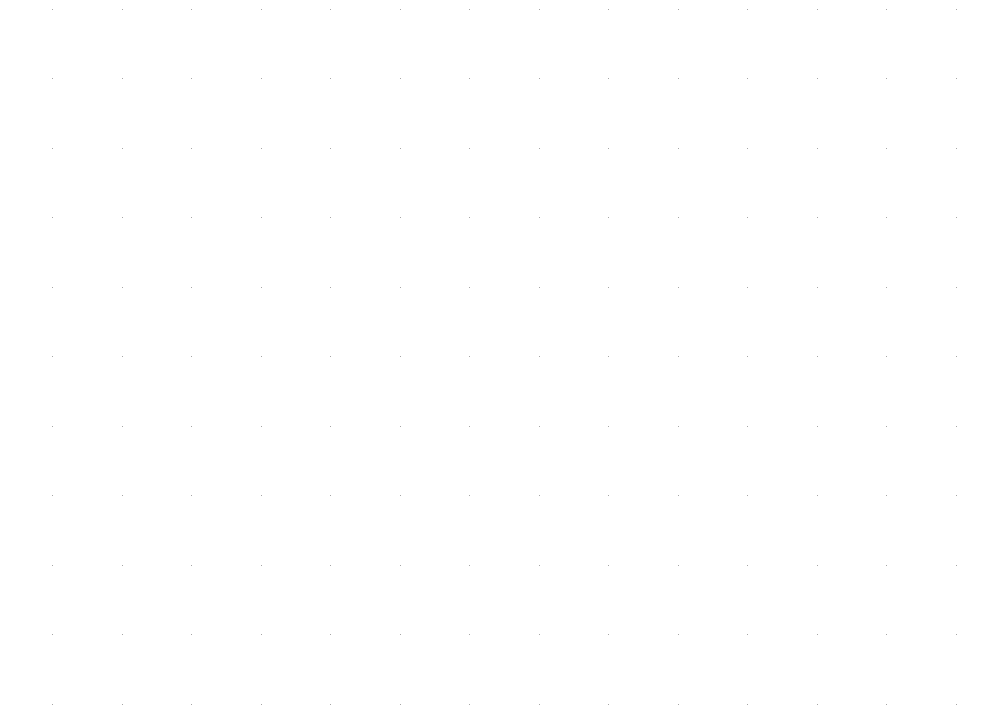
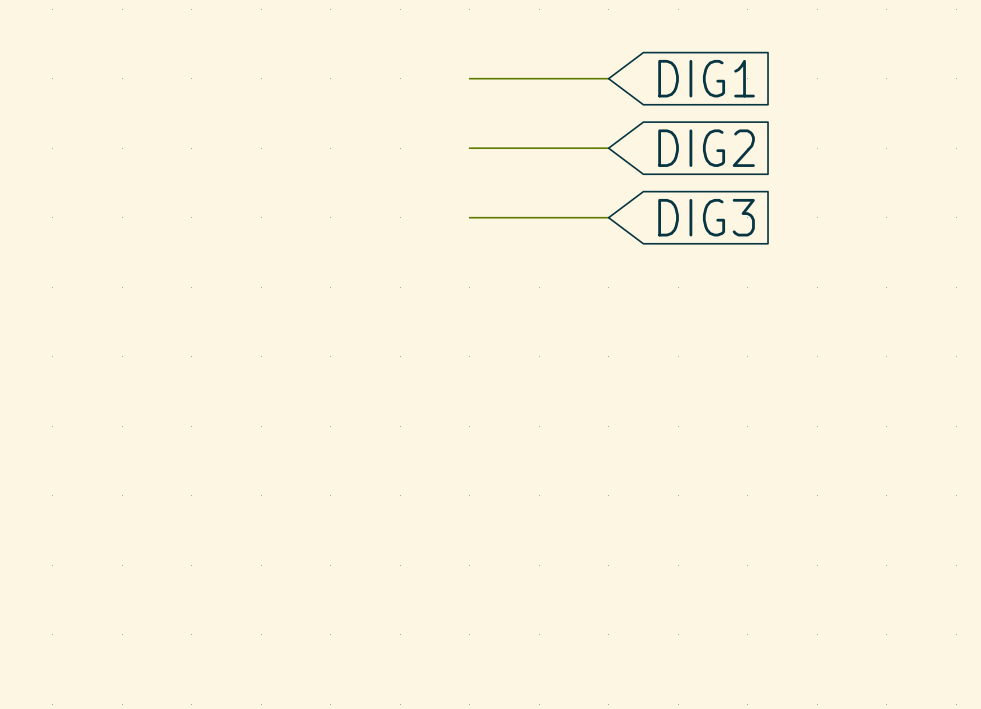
wire: none -> (469, 78) (608, 78)
global label: none -> DIG1 (706, 78)
wire: none -> (469, 148) (608, 148)
global label: none -> DIG2 (706, 148)
wire: none -> (469, 217) (608, 217)
global label: none -> DIG3 (706, 217)

